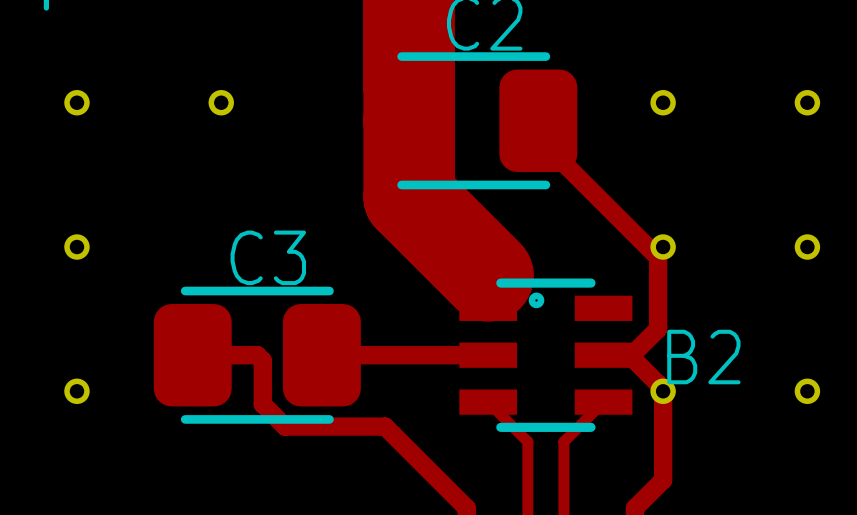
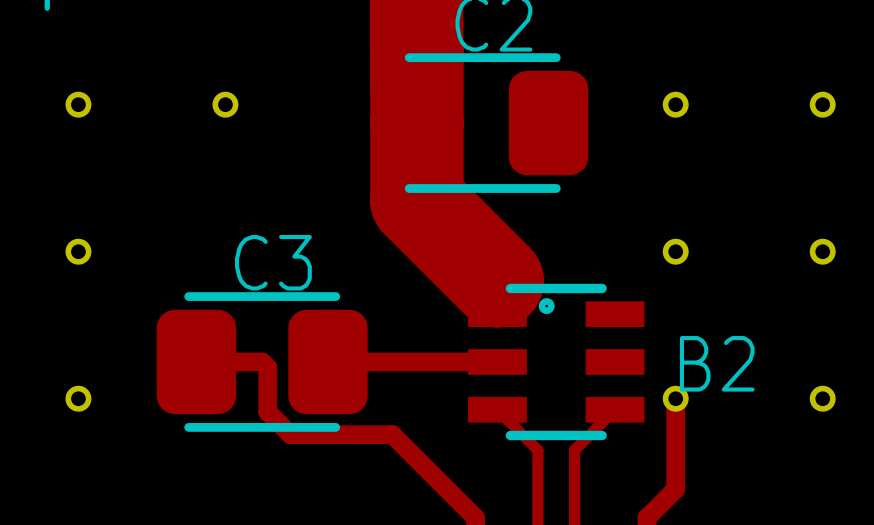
top track: (538, 120) (542, 125) (542, 142) (658, 257) (658, 328) (630, 356) -> none
top track: (630, 356) (663, 391) -> none

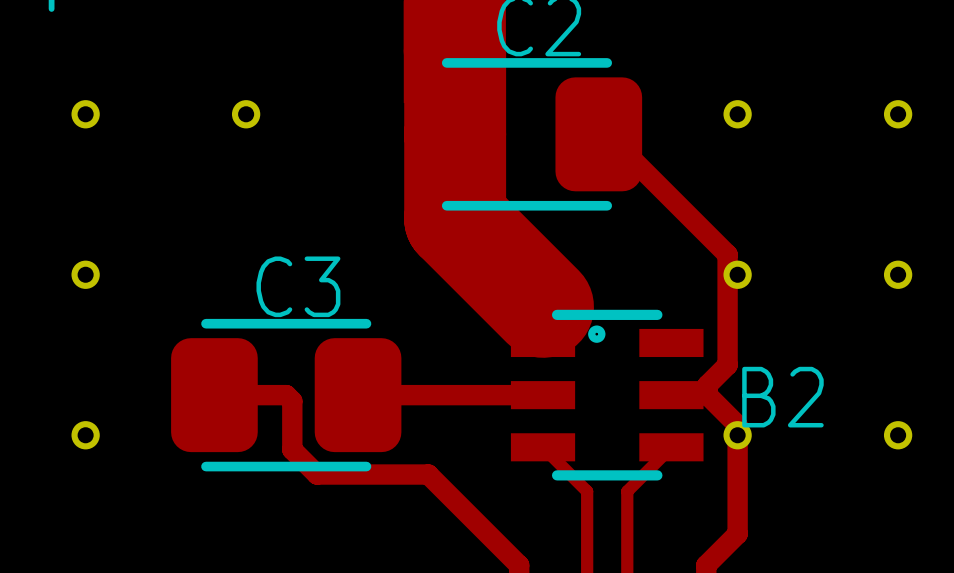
top track: none -> (598, 134) (607, 134) (727, 254) (727, 365) (707, 385) (707, 395)
top track: none -> (707, 395) (737, 425) (737, 435)

